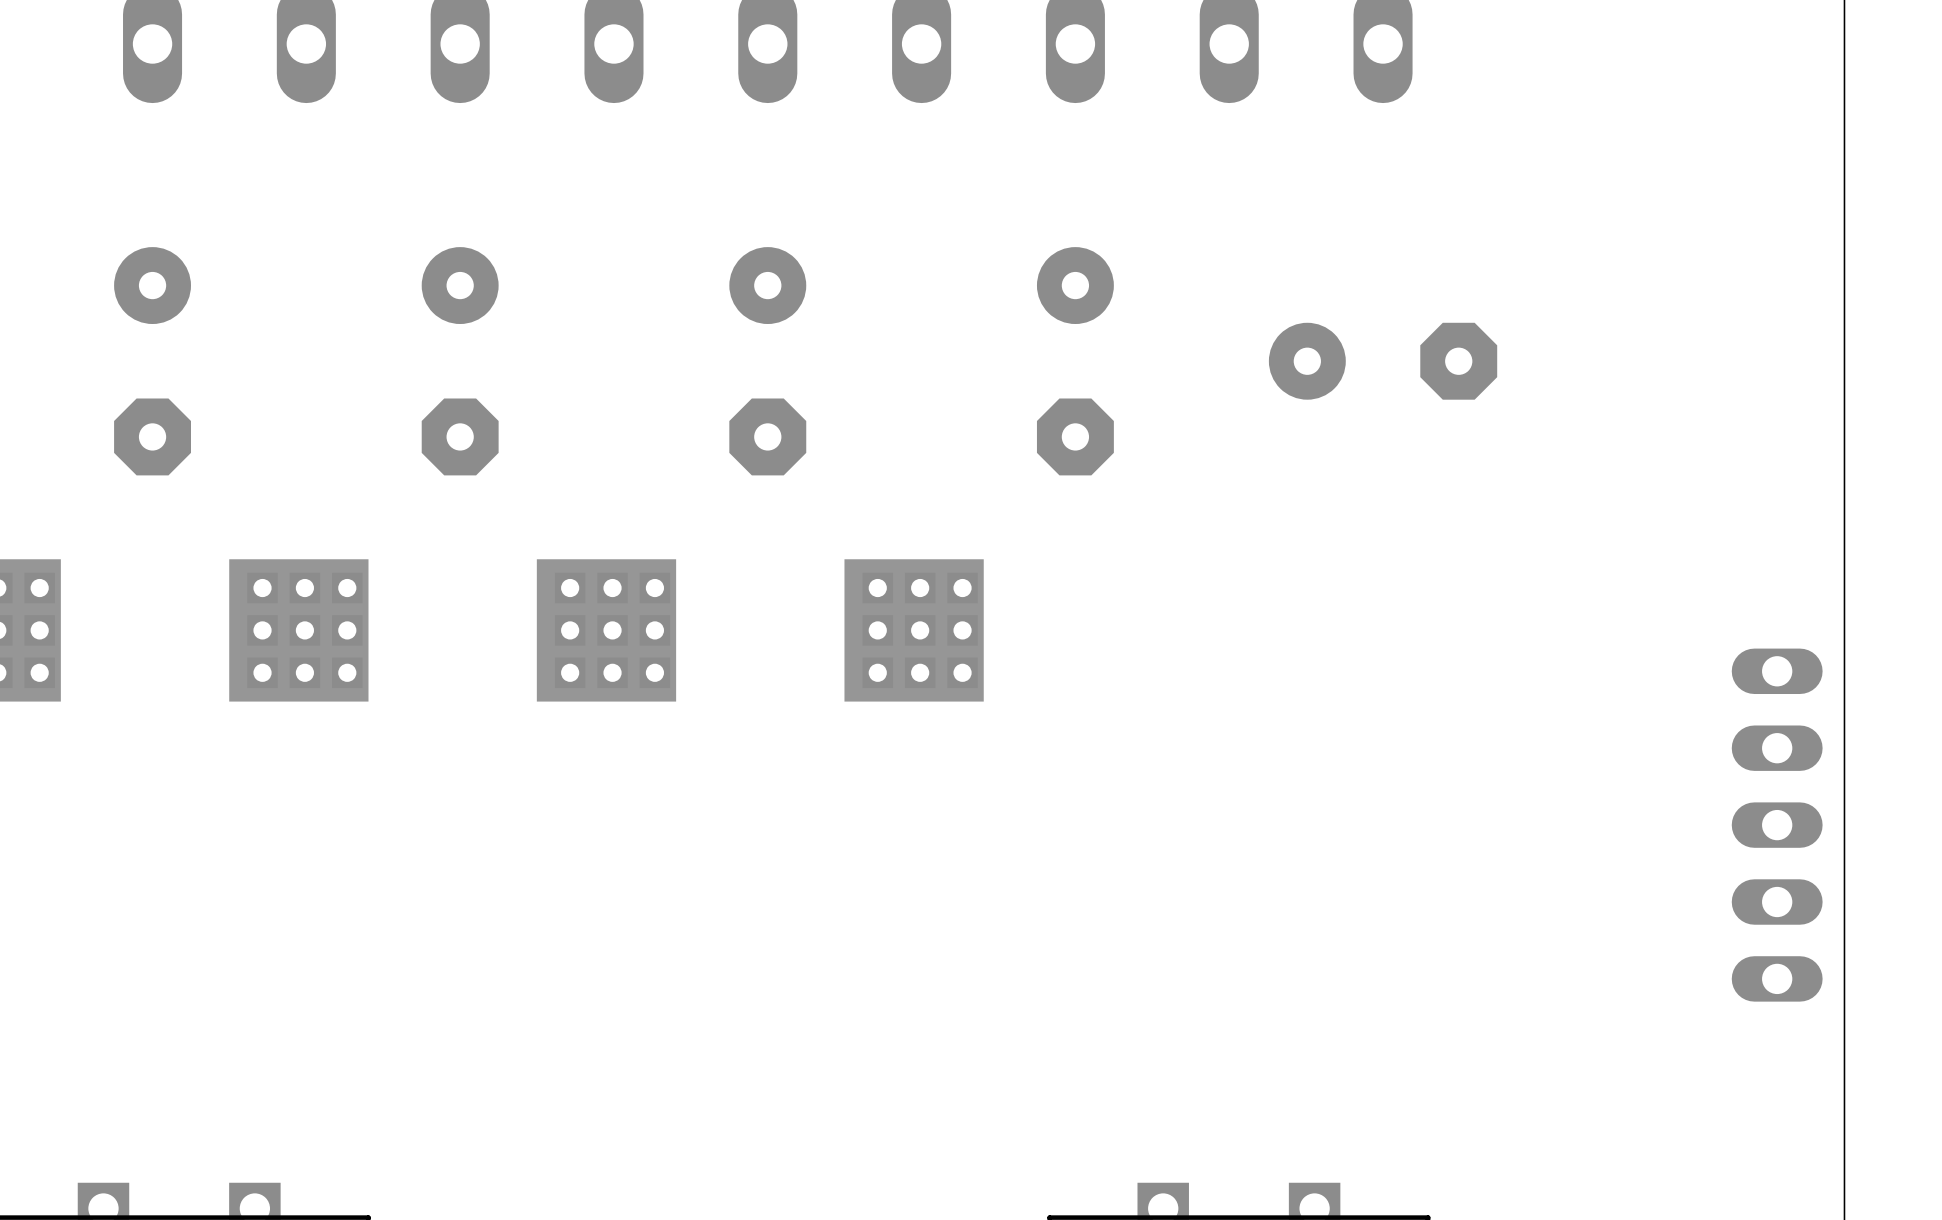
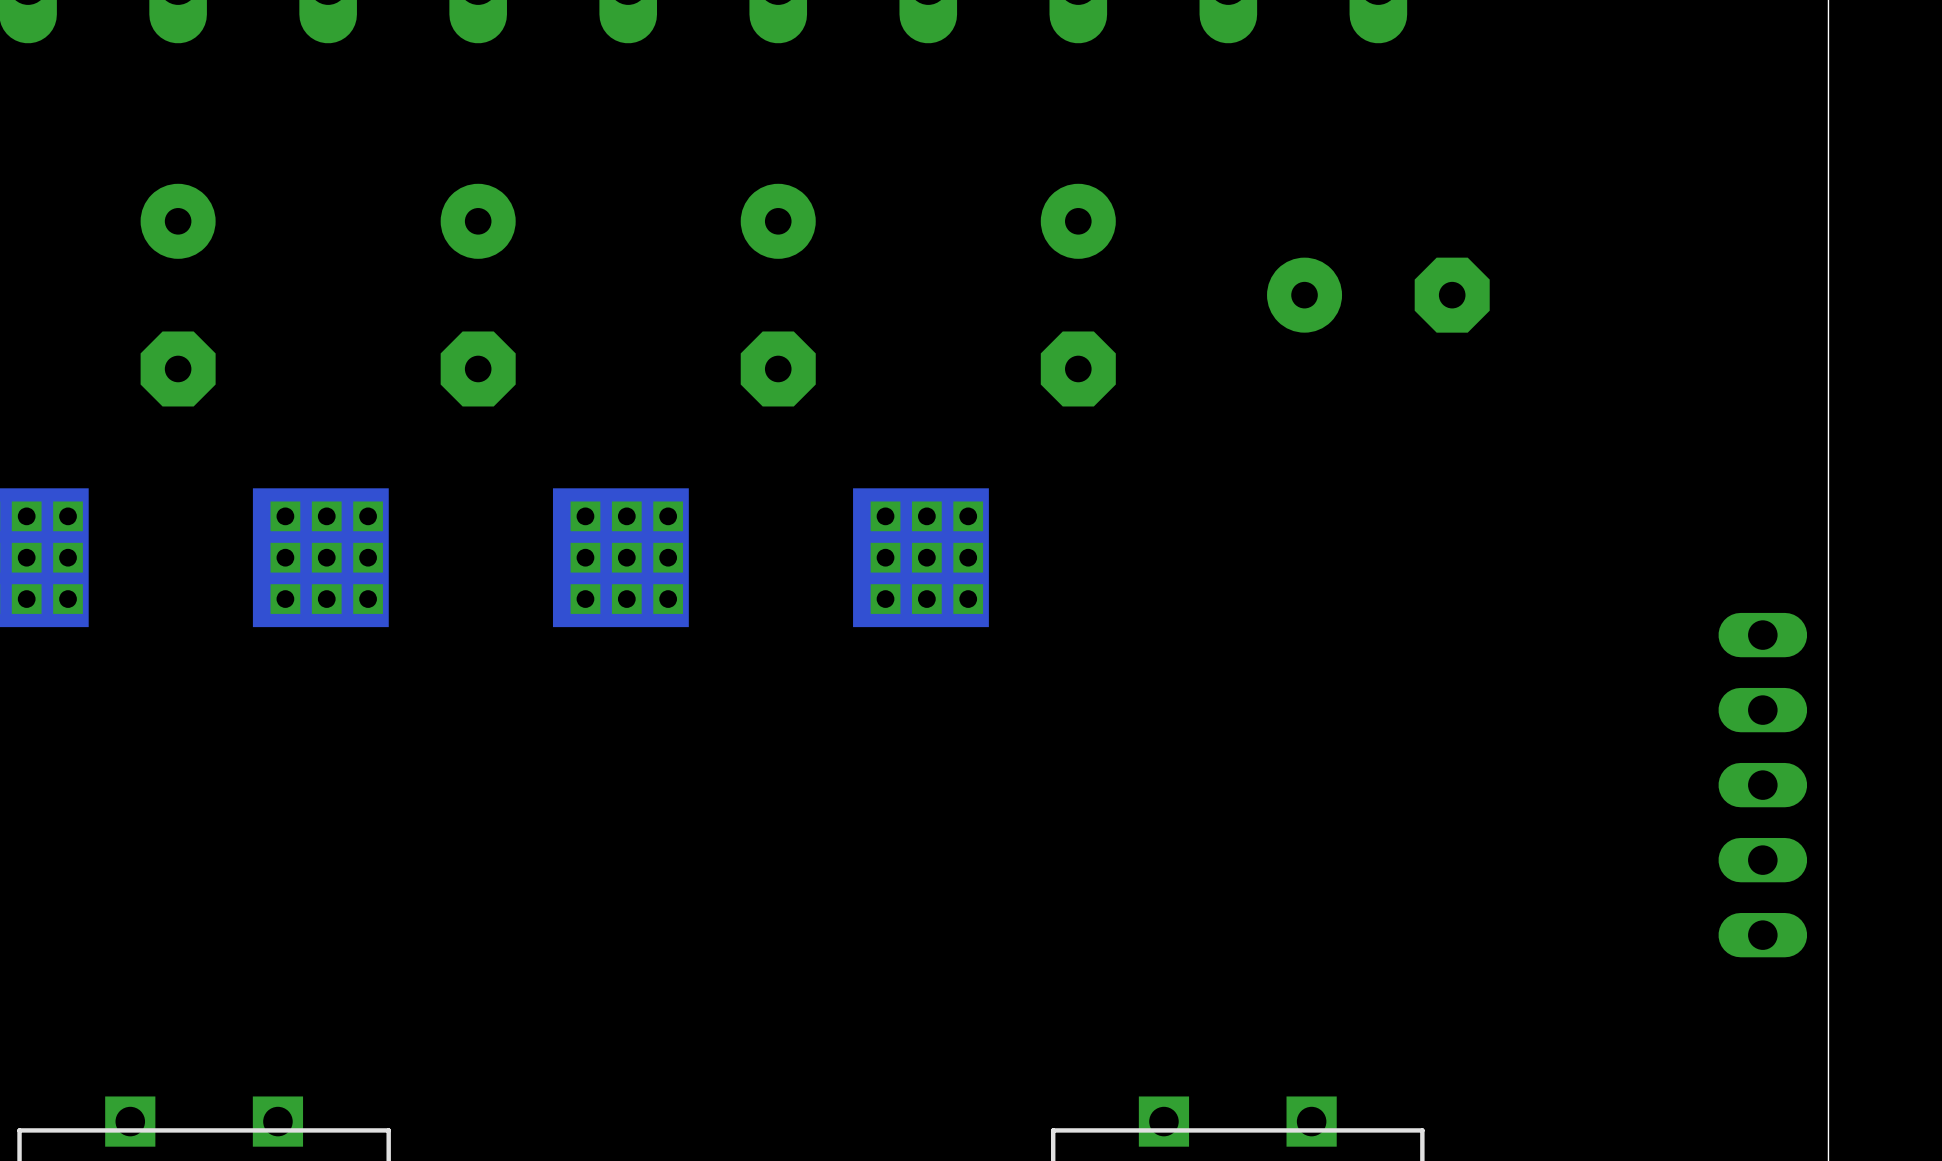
part position: (1777, 825) -> (1762, 785)

